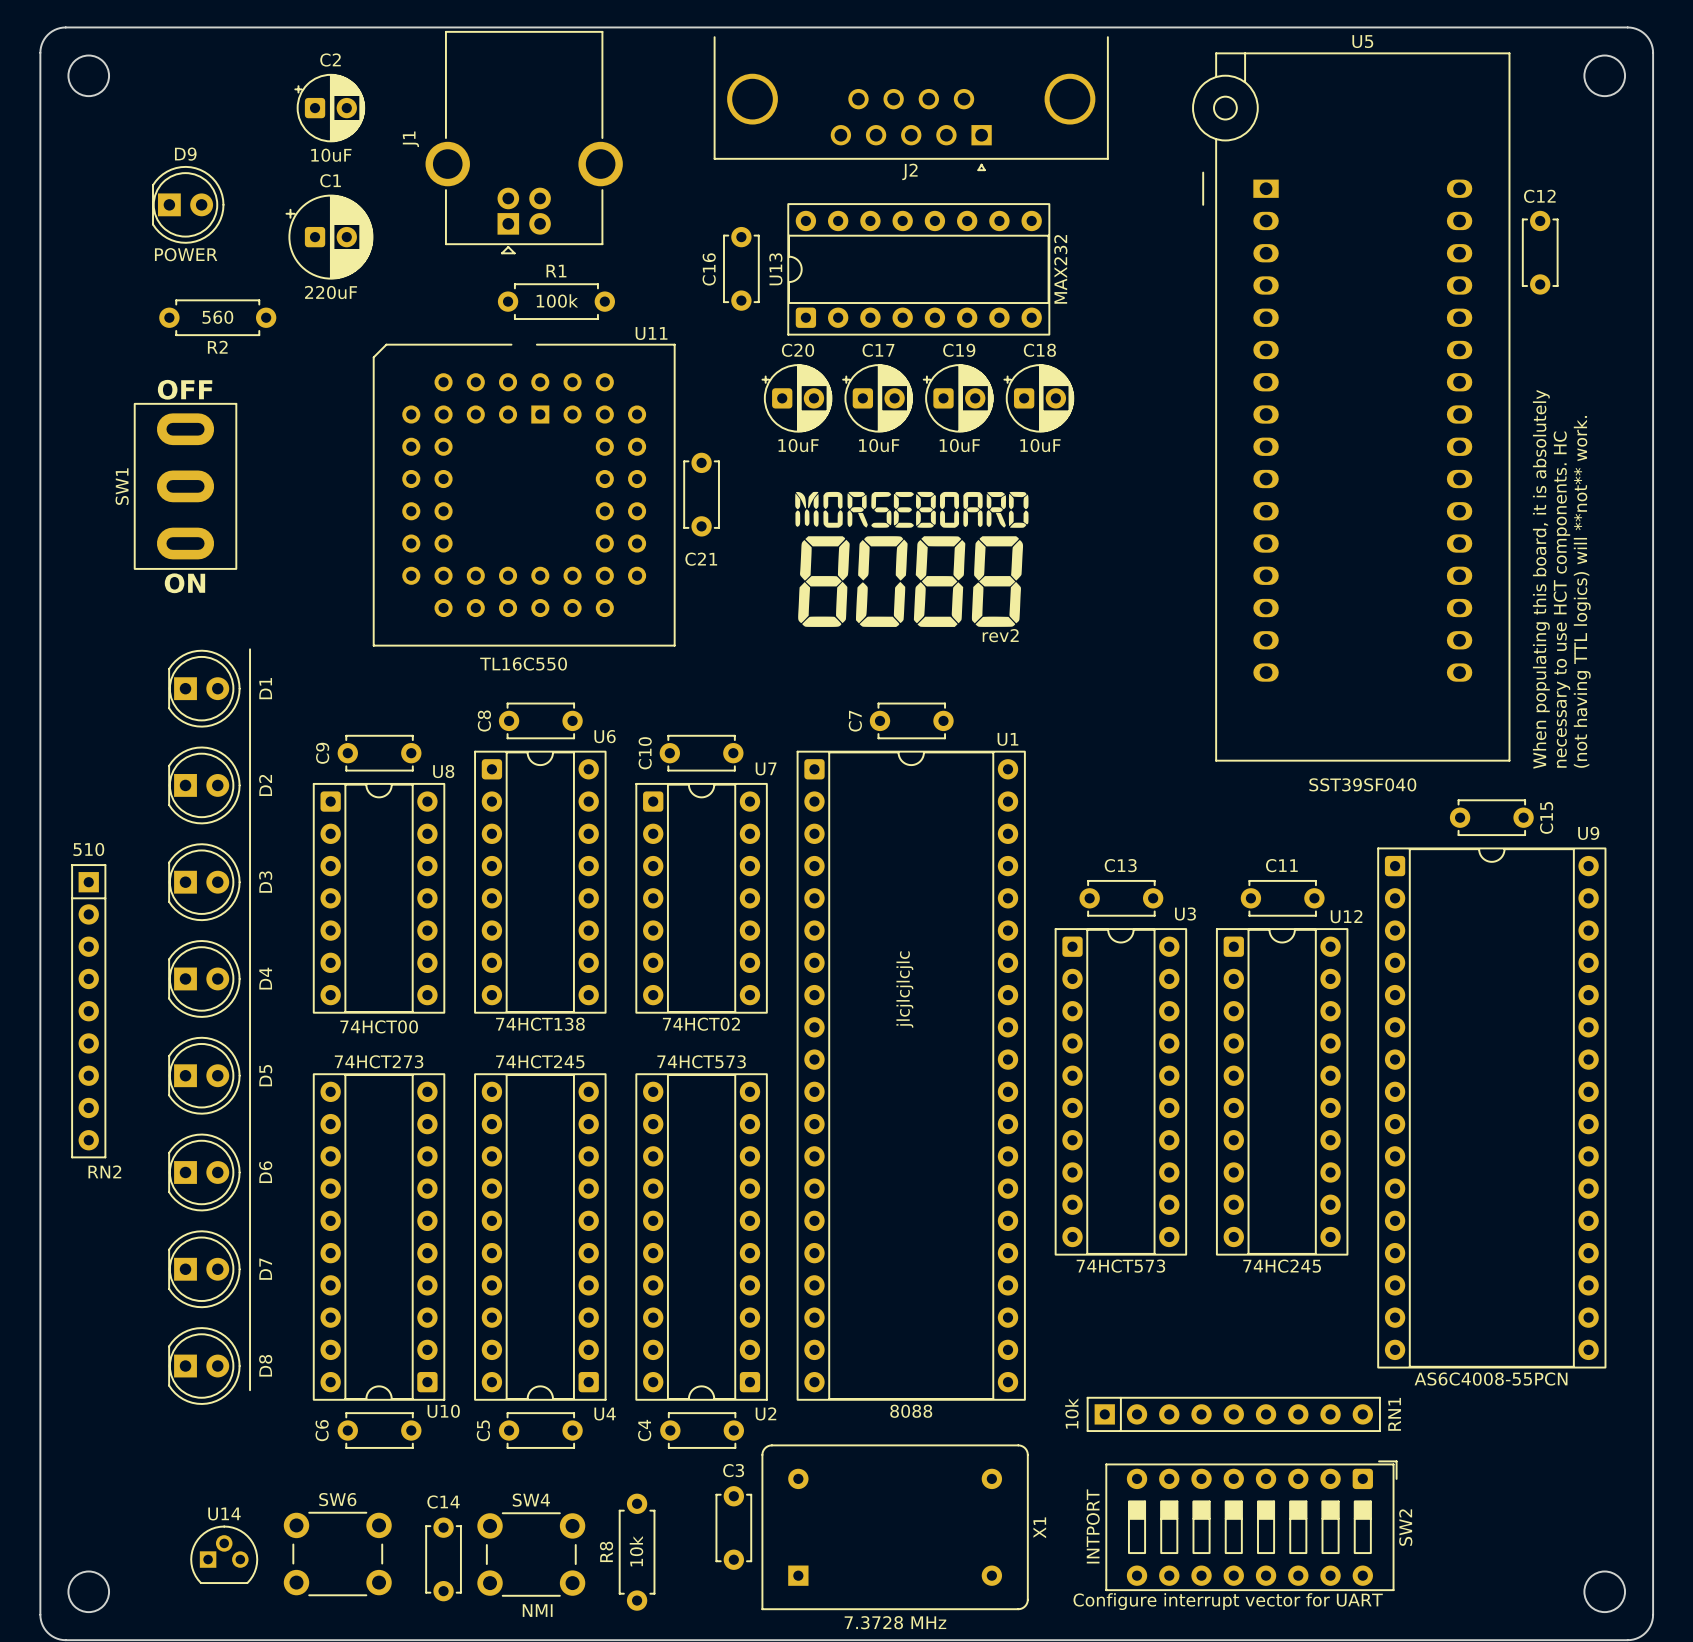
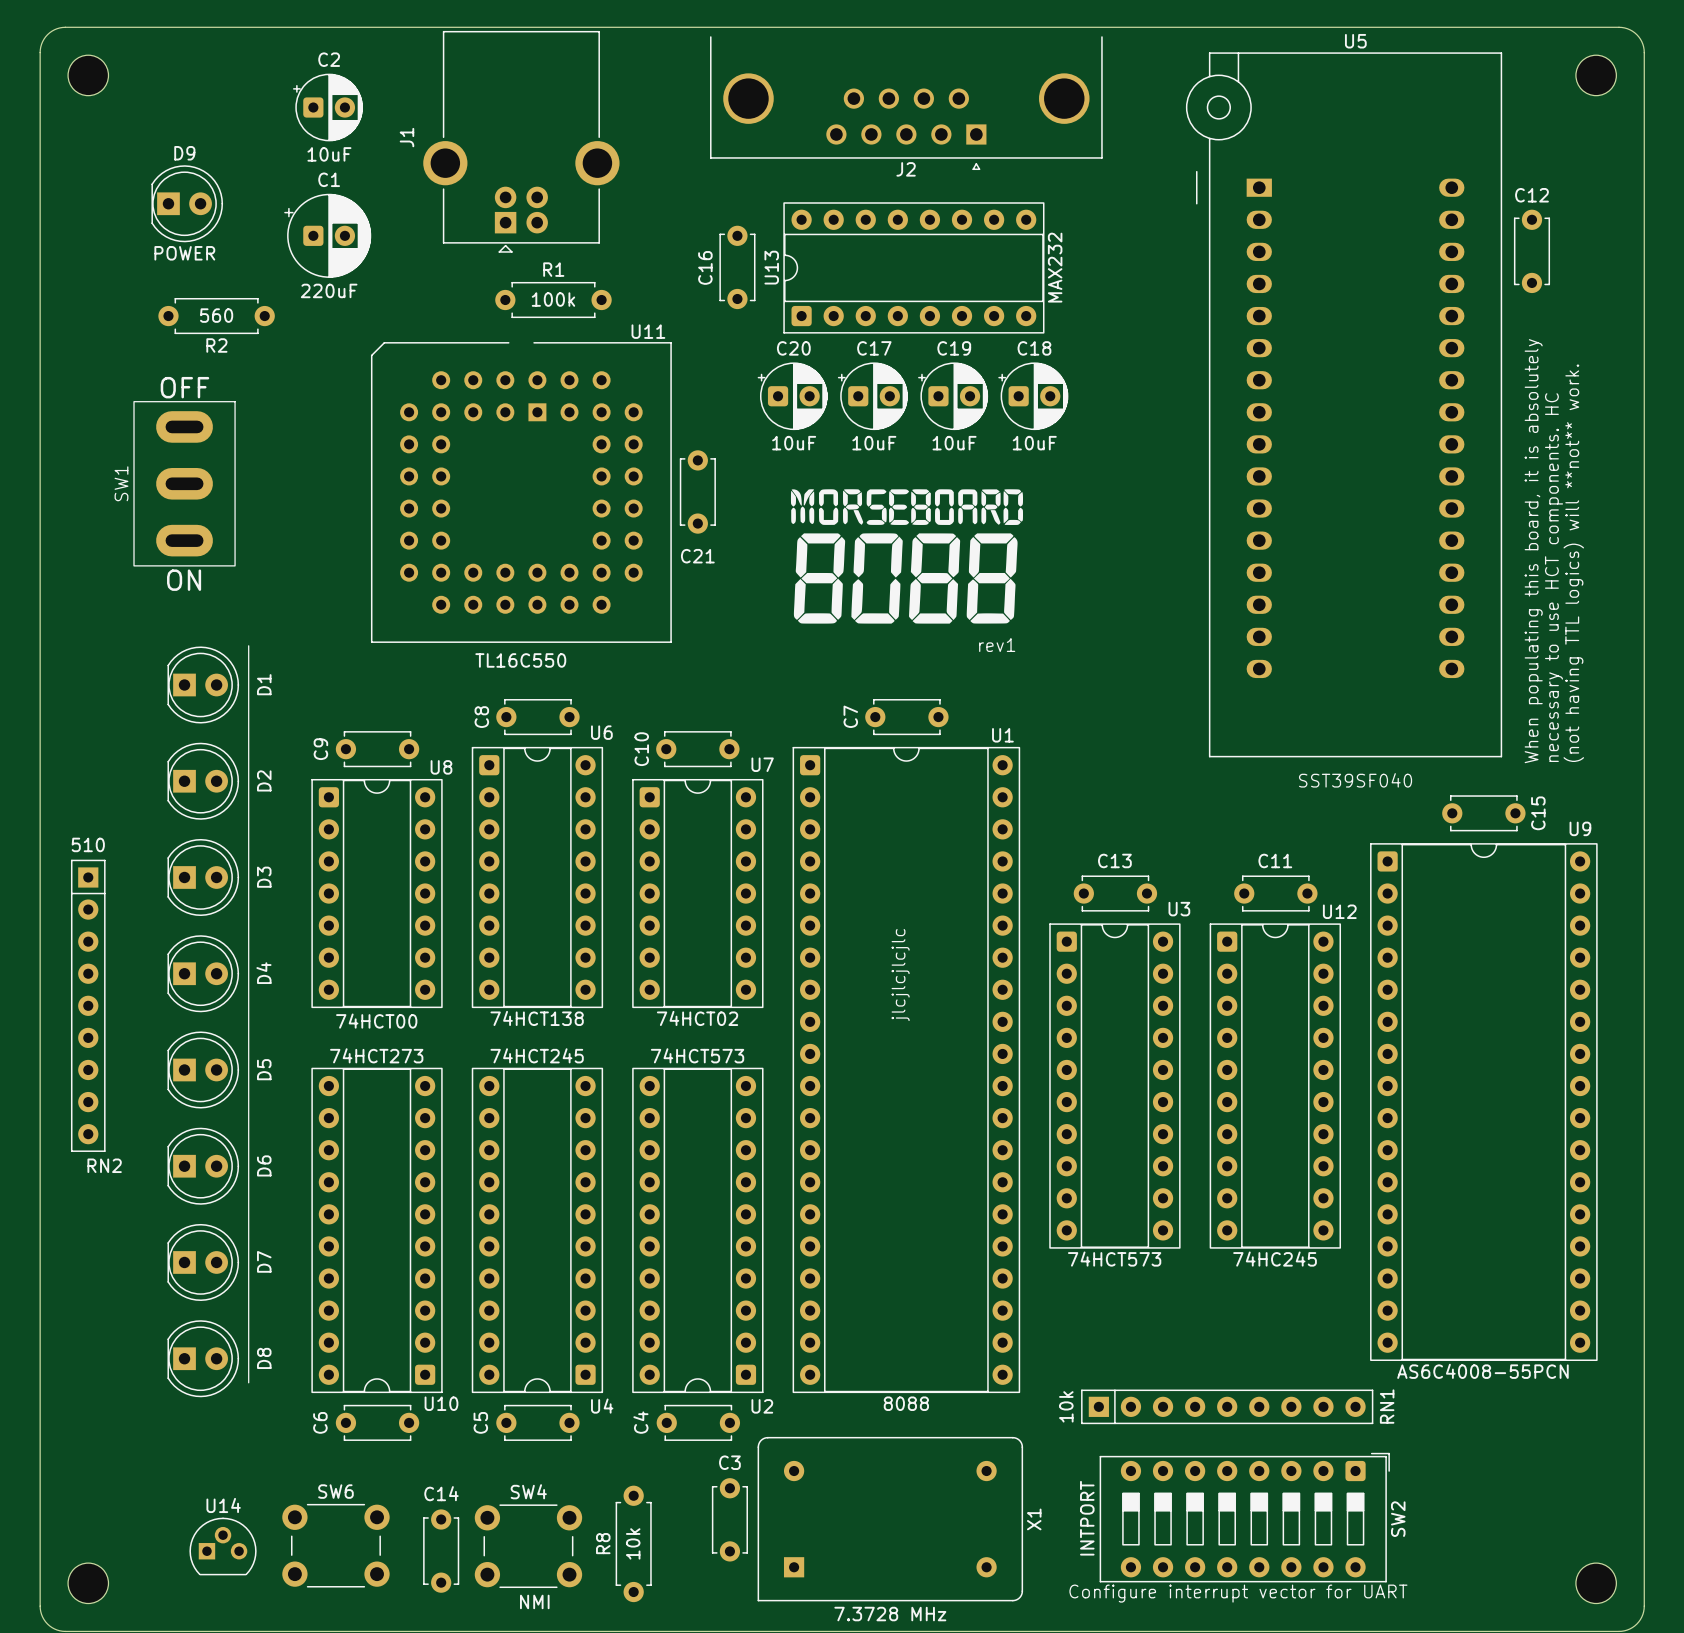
text: rev2 (1000, 635) -> rev1 (997, 645)

